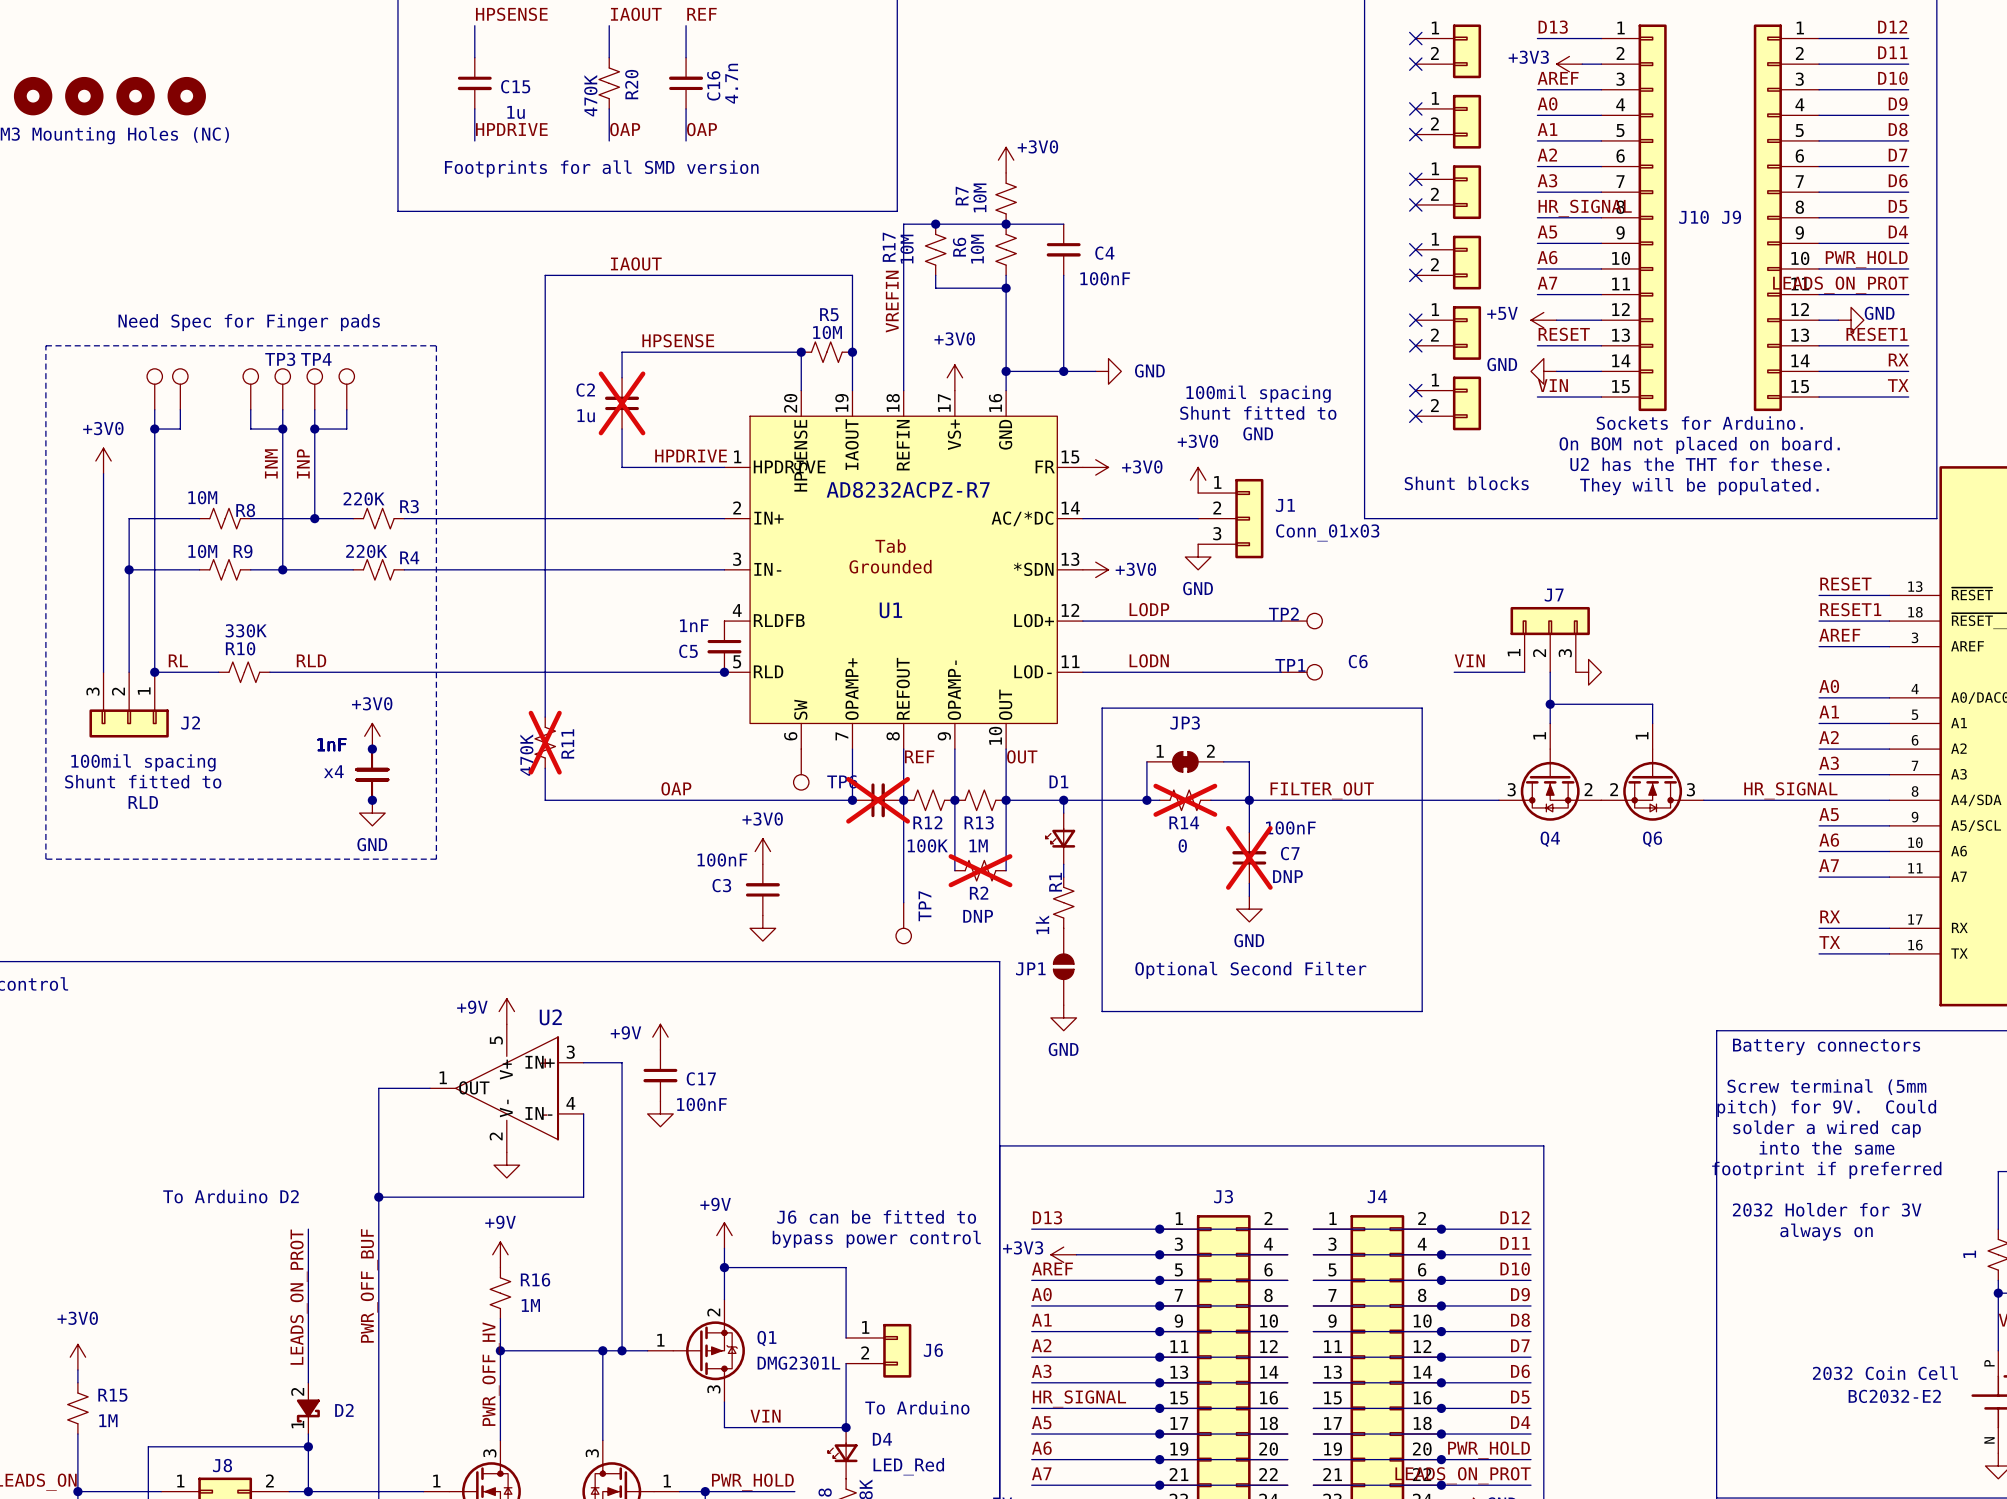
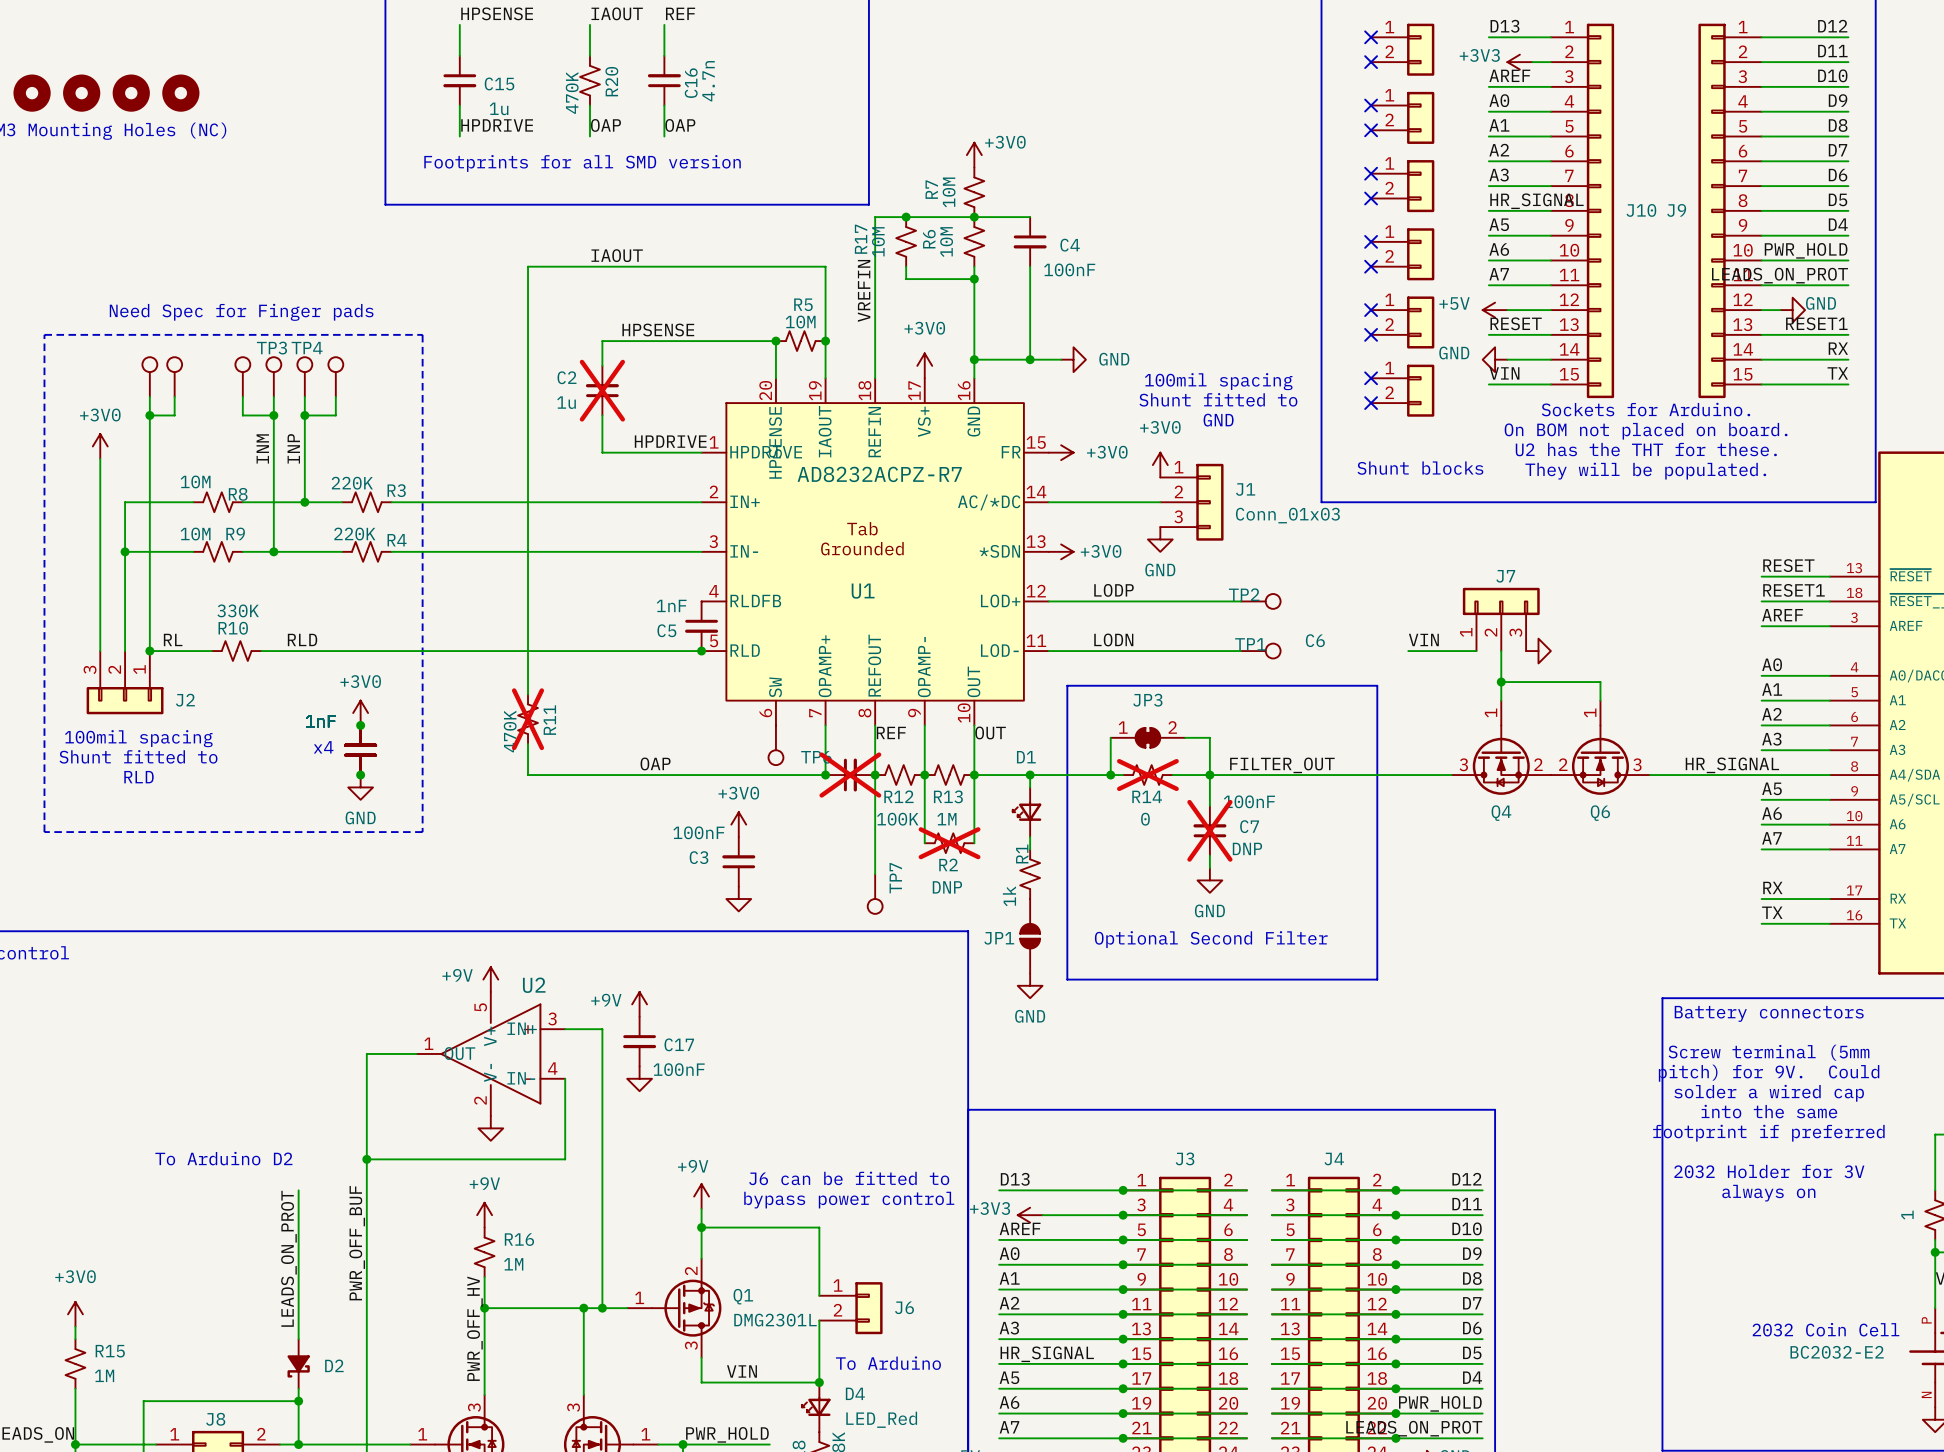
D2 pin number: 2 (297, 1391) -> none
D2 pin number: 1 (297, 1424) -> none

